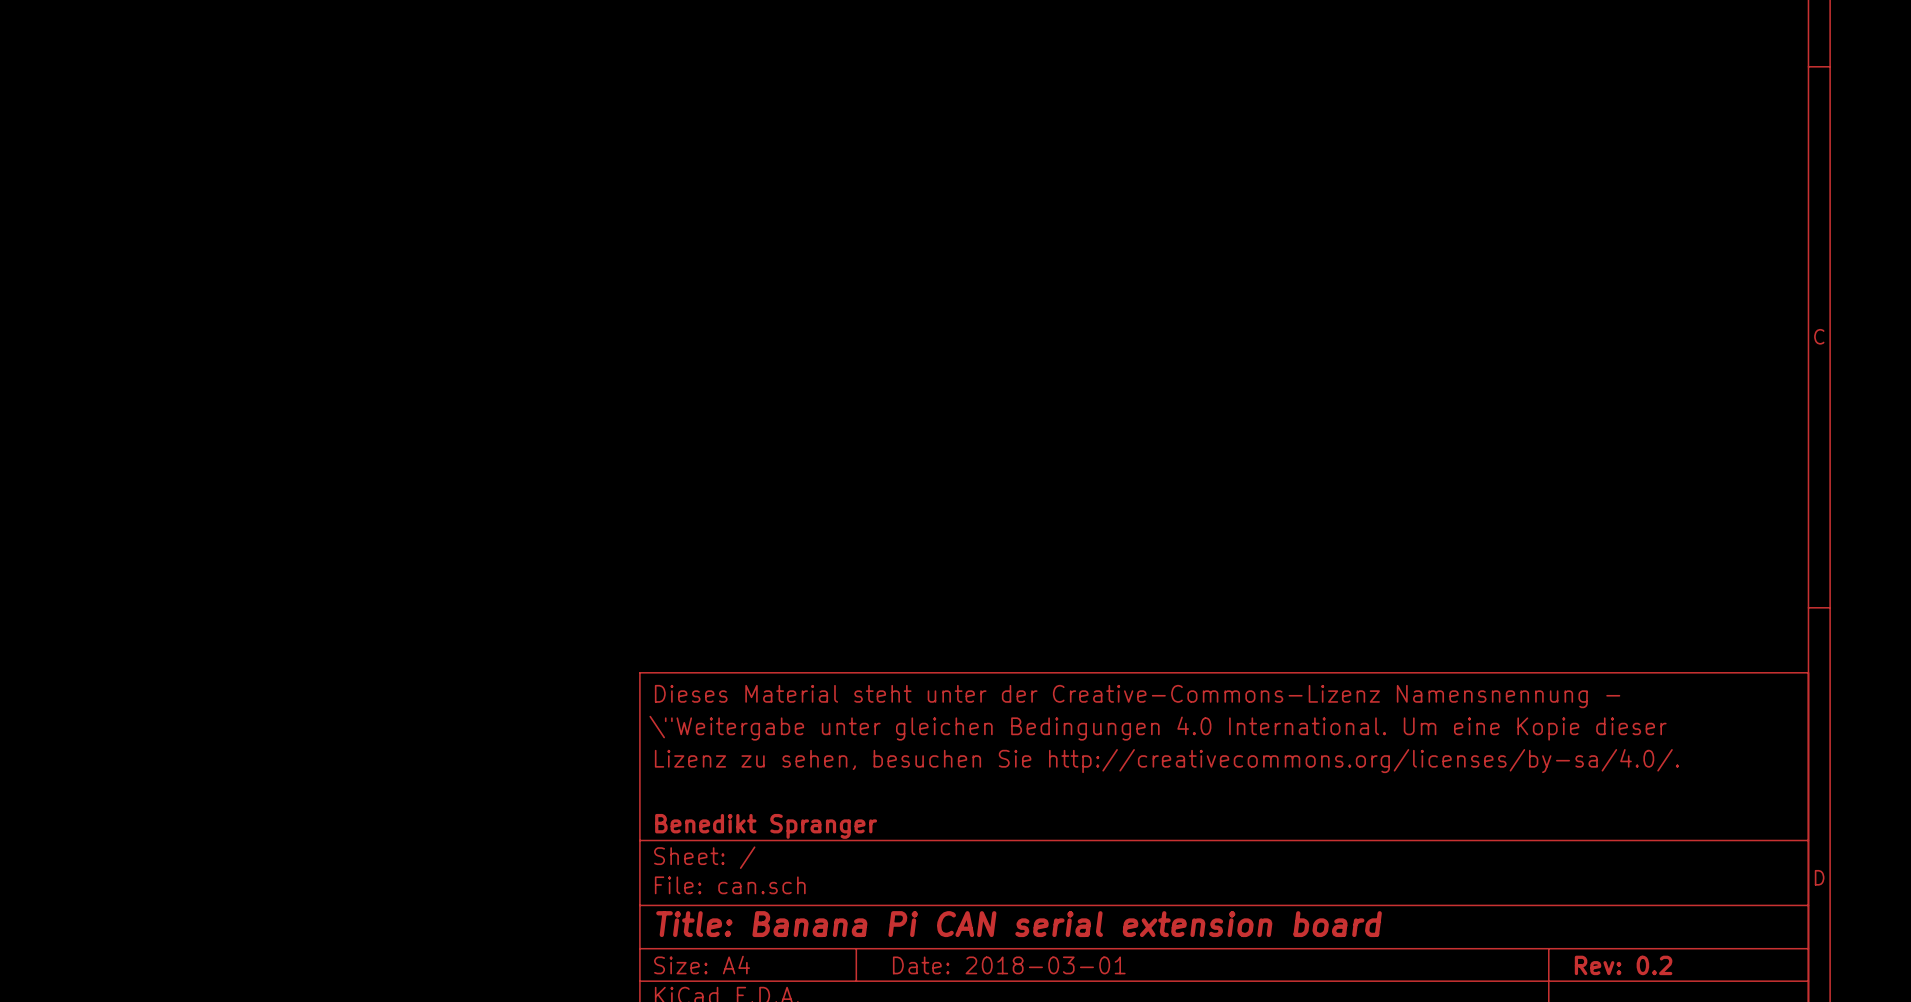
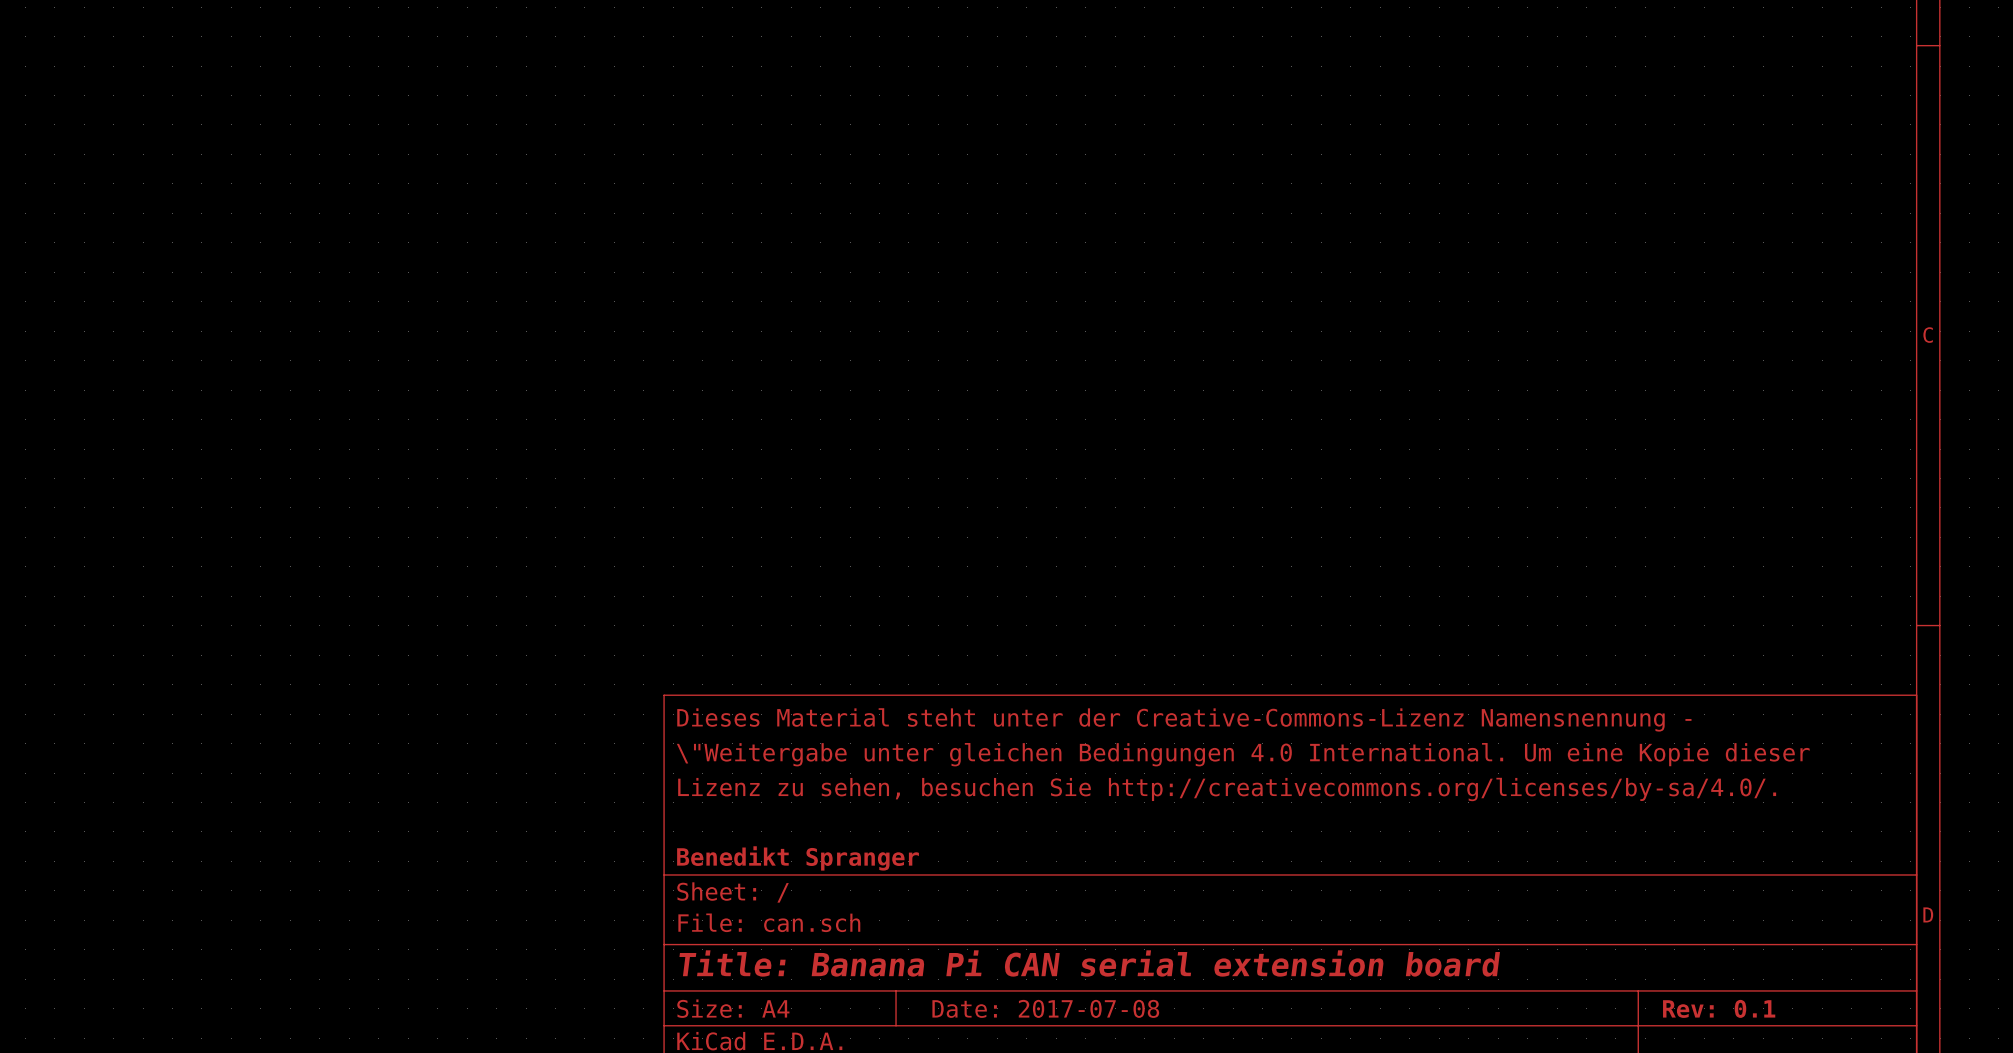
title block: Date: 2018-03-01 (1009, 965) -> Date: 2017-07-08 (1045, 1008)
title block: Rev: 0.2 (1623, 965) -> Rev: 0.1 (1719, 1008)

